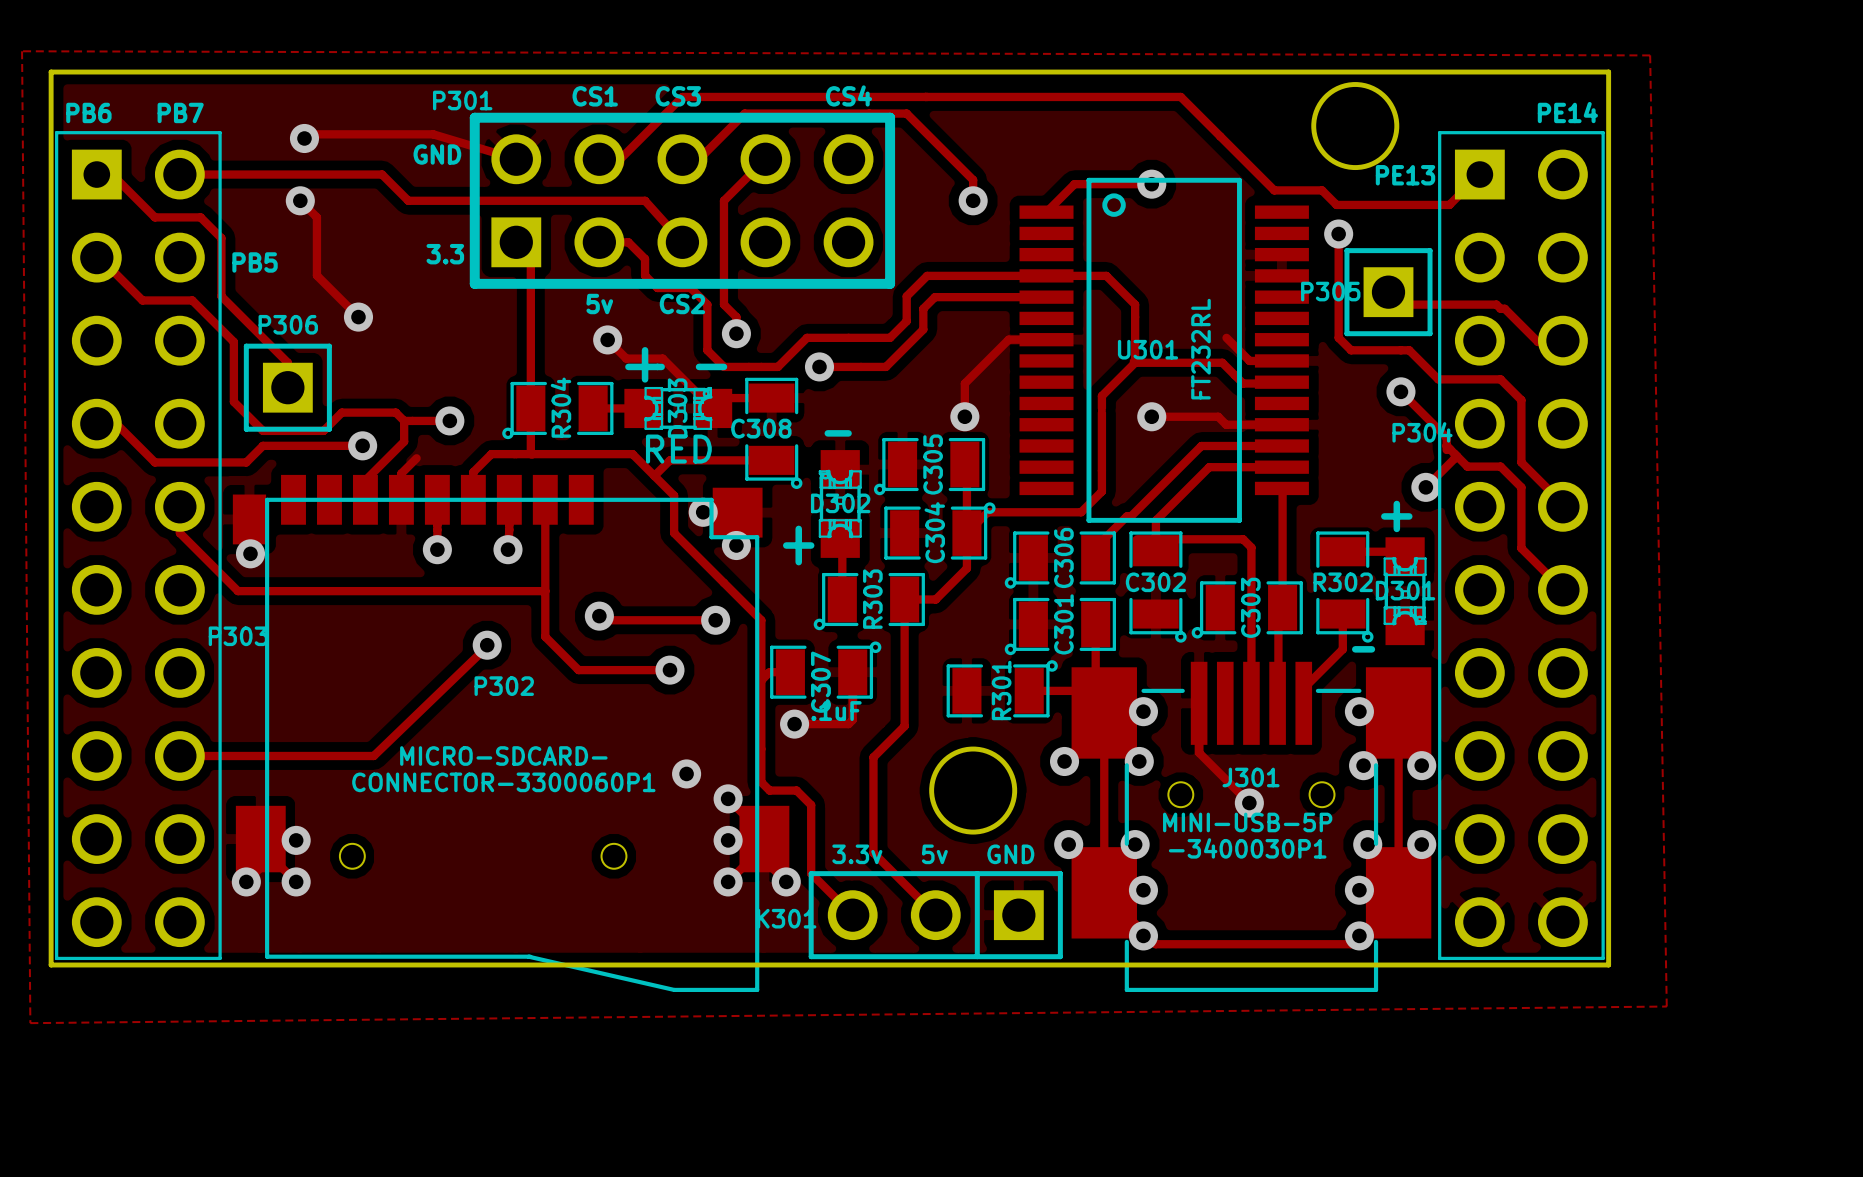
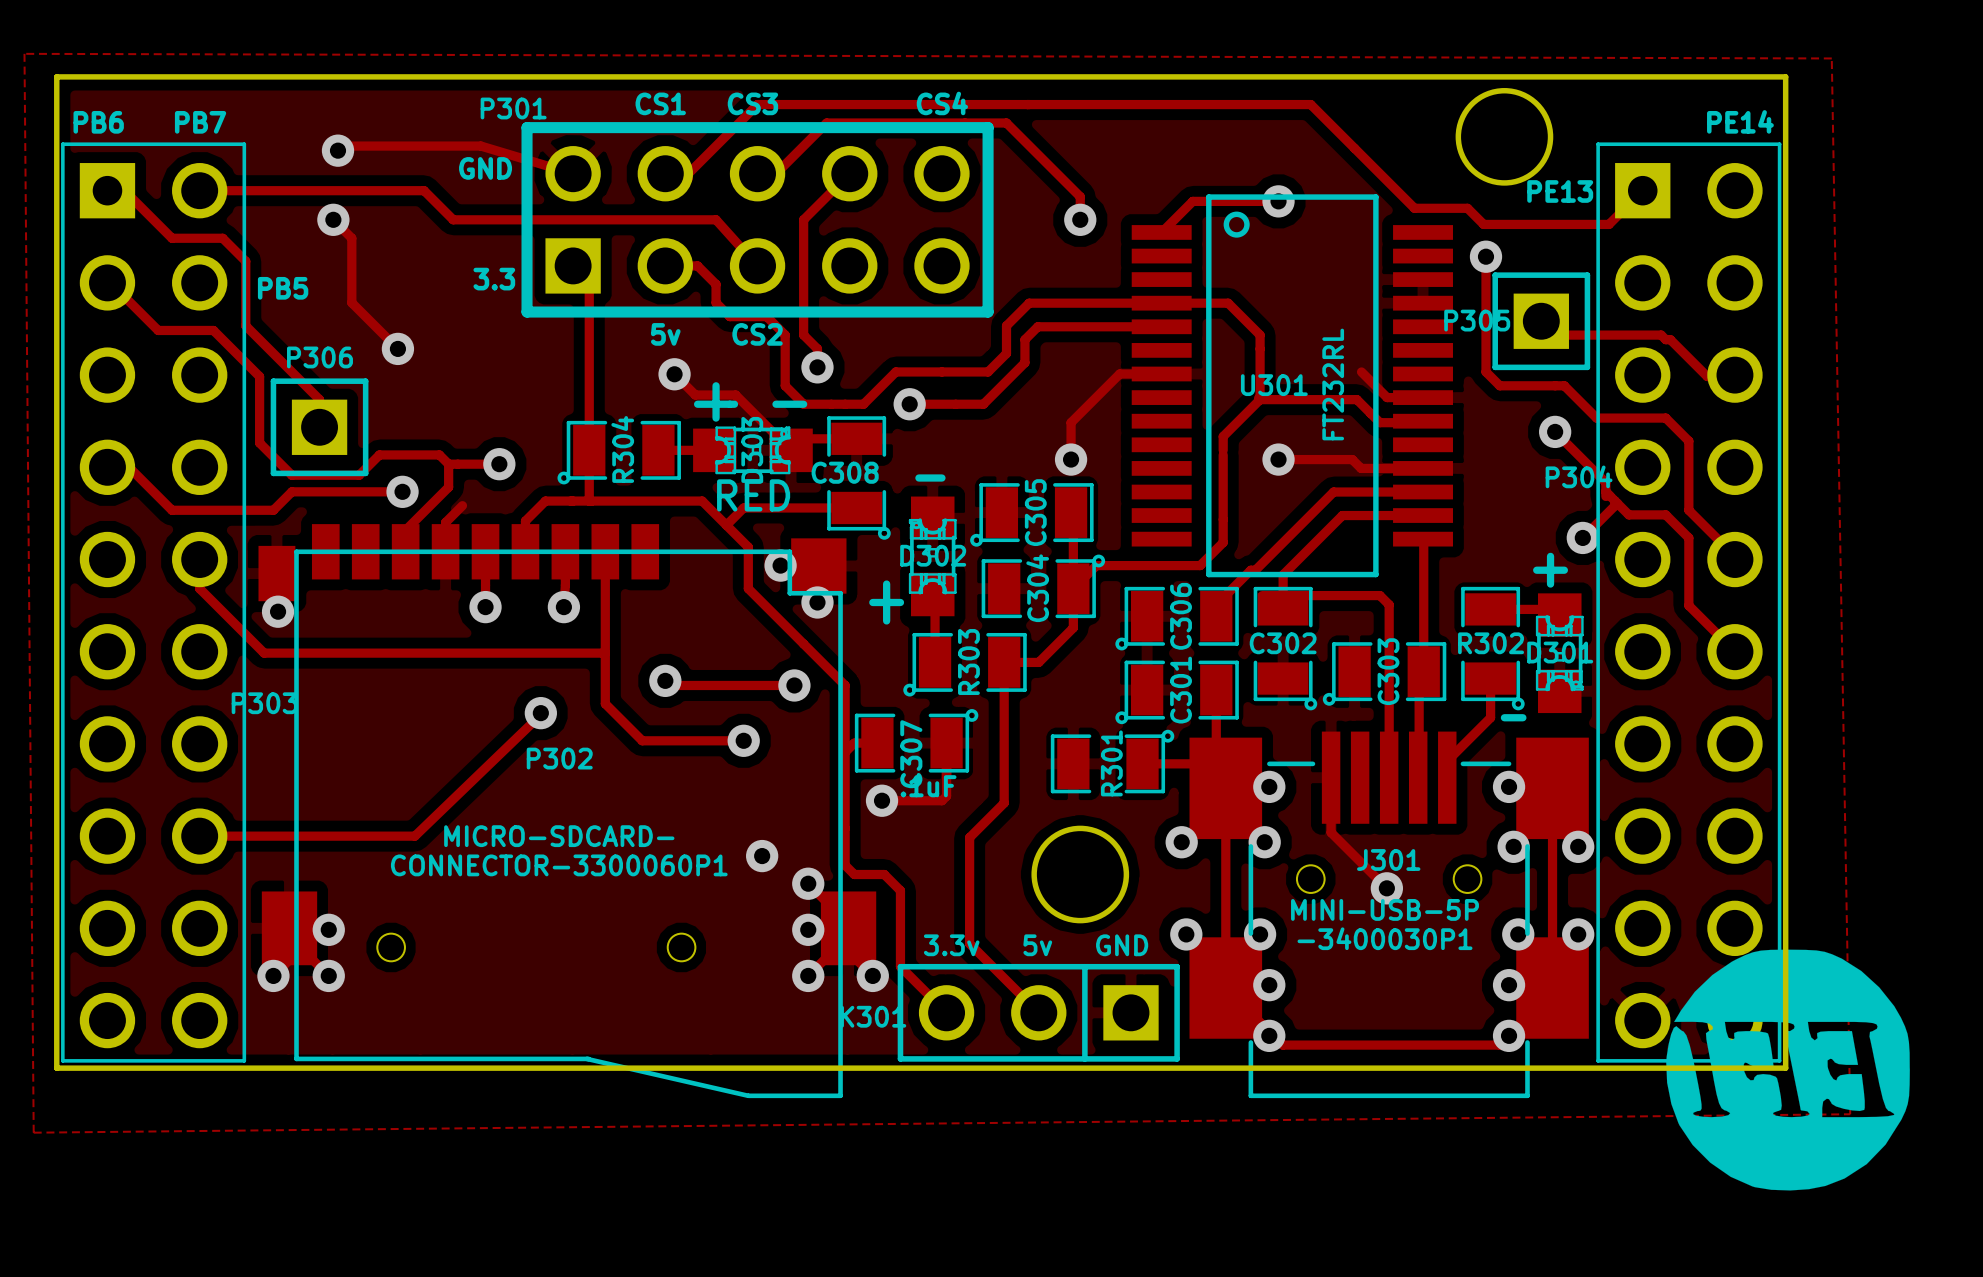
drawing: none -> [1666, 949, 1910, 1191]

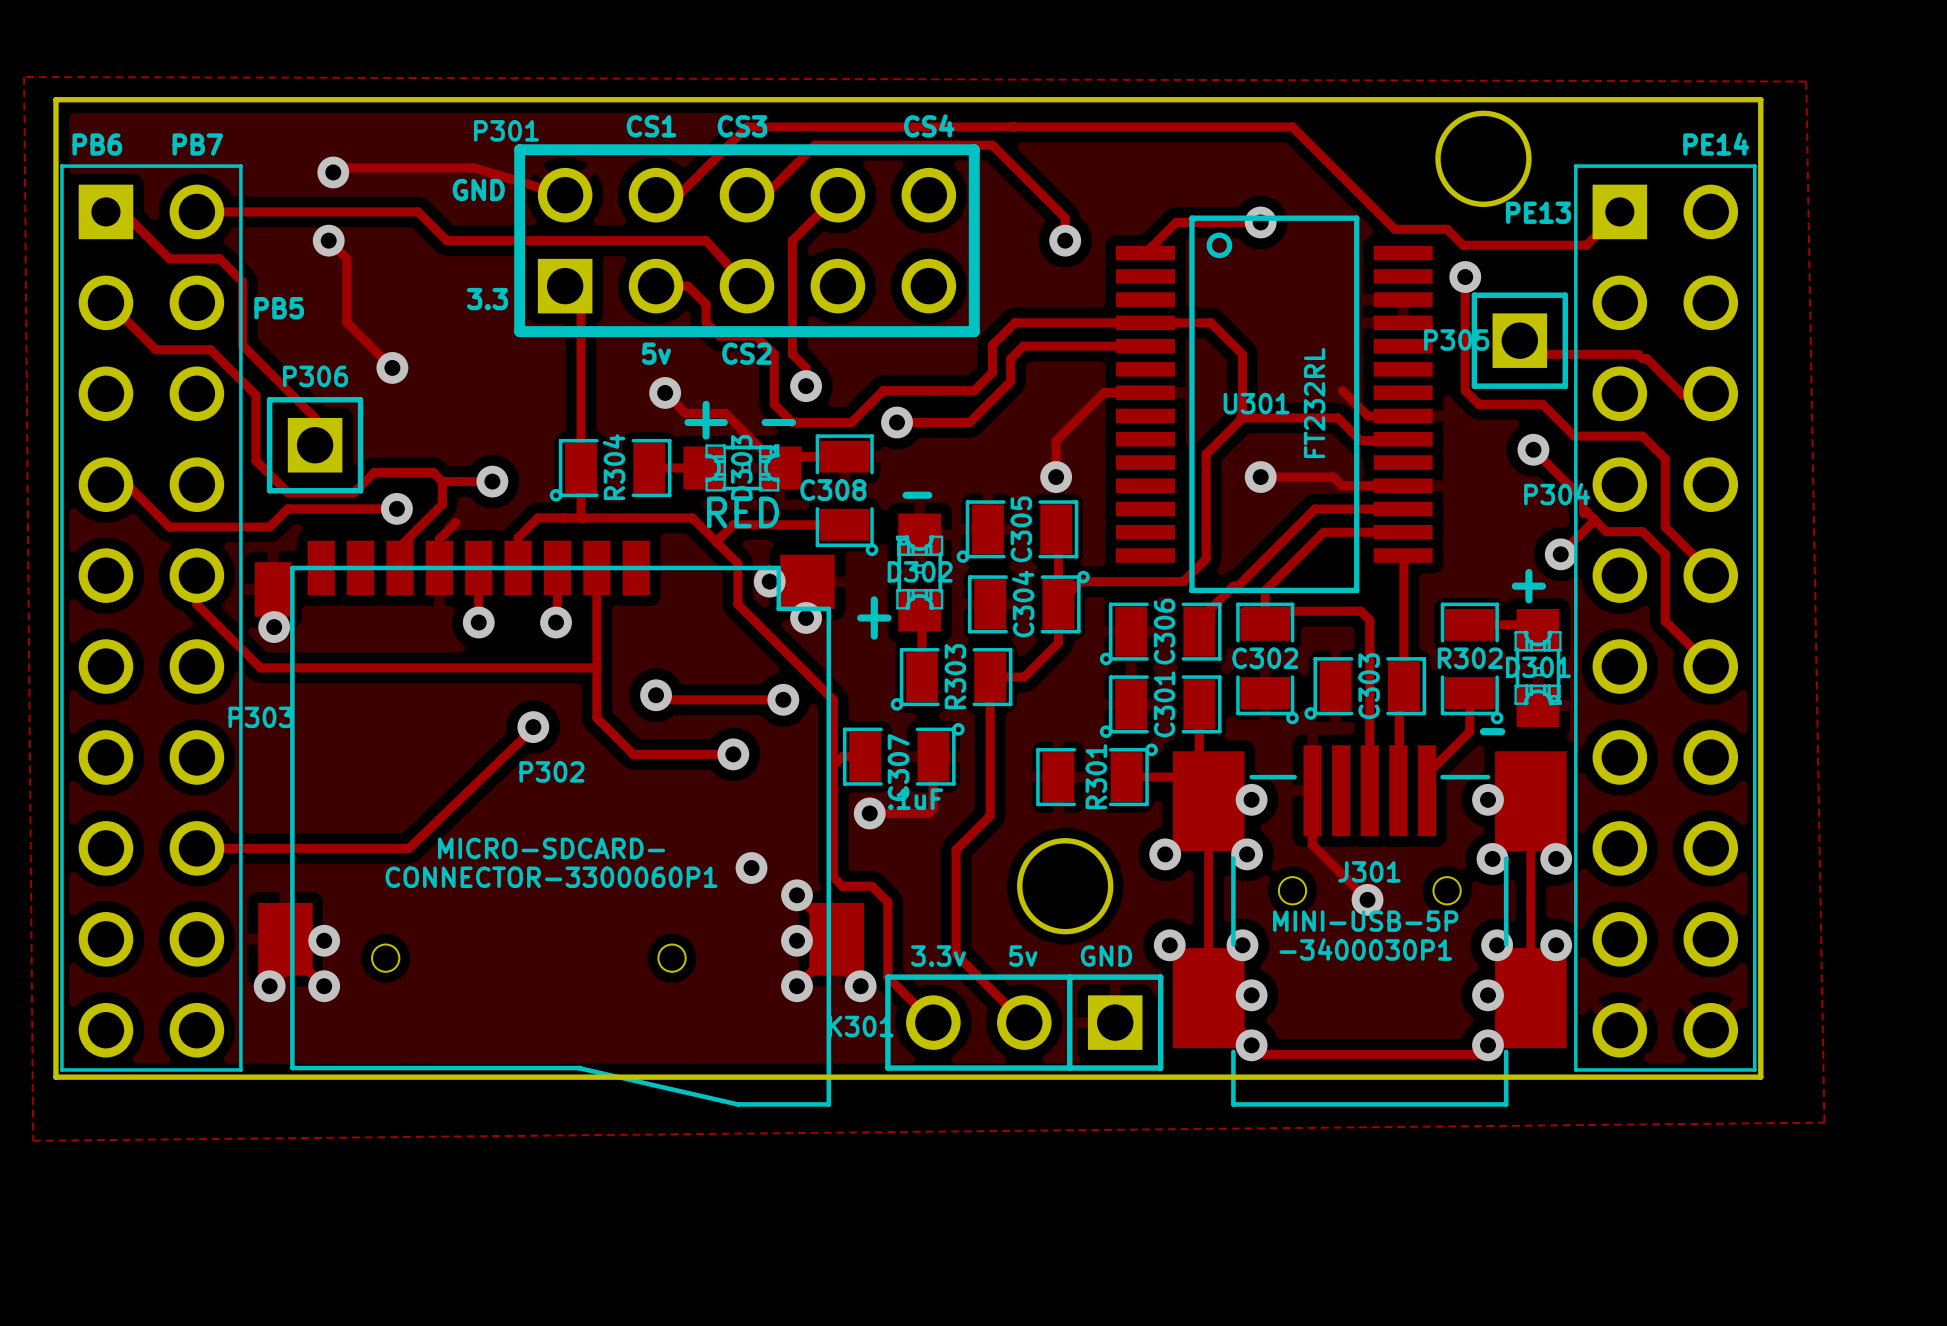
drawing: [1666, 949, 1910, 1191] -> none

